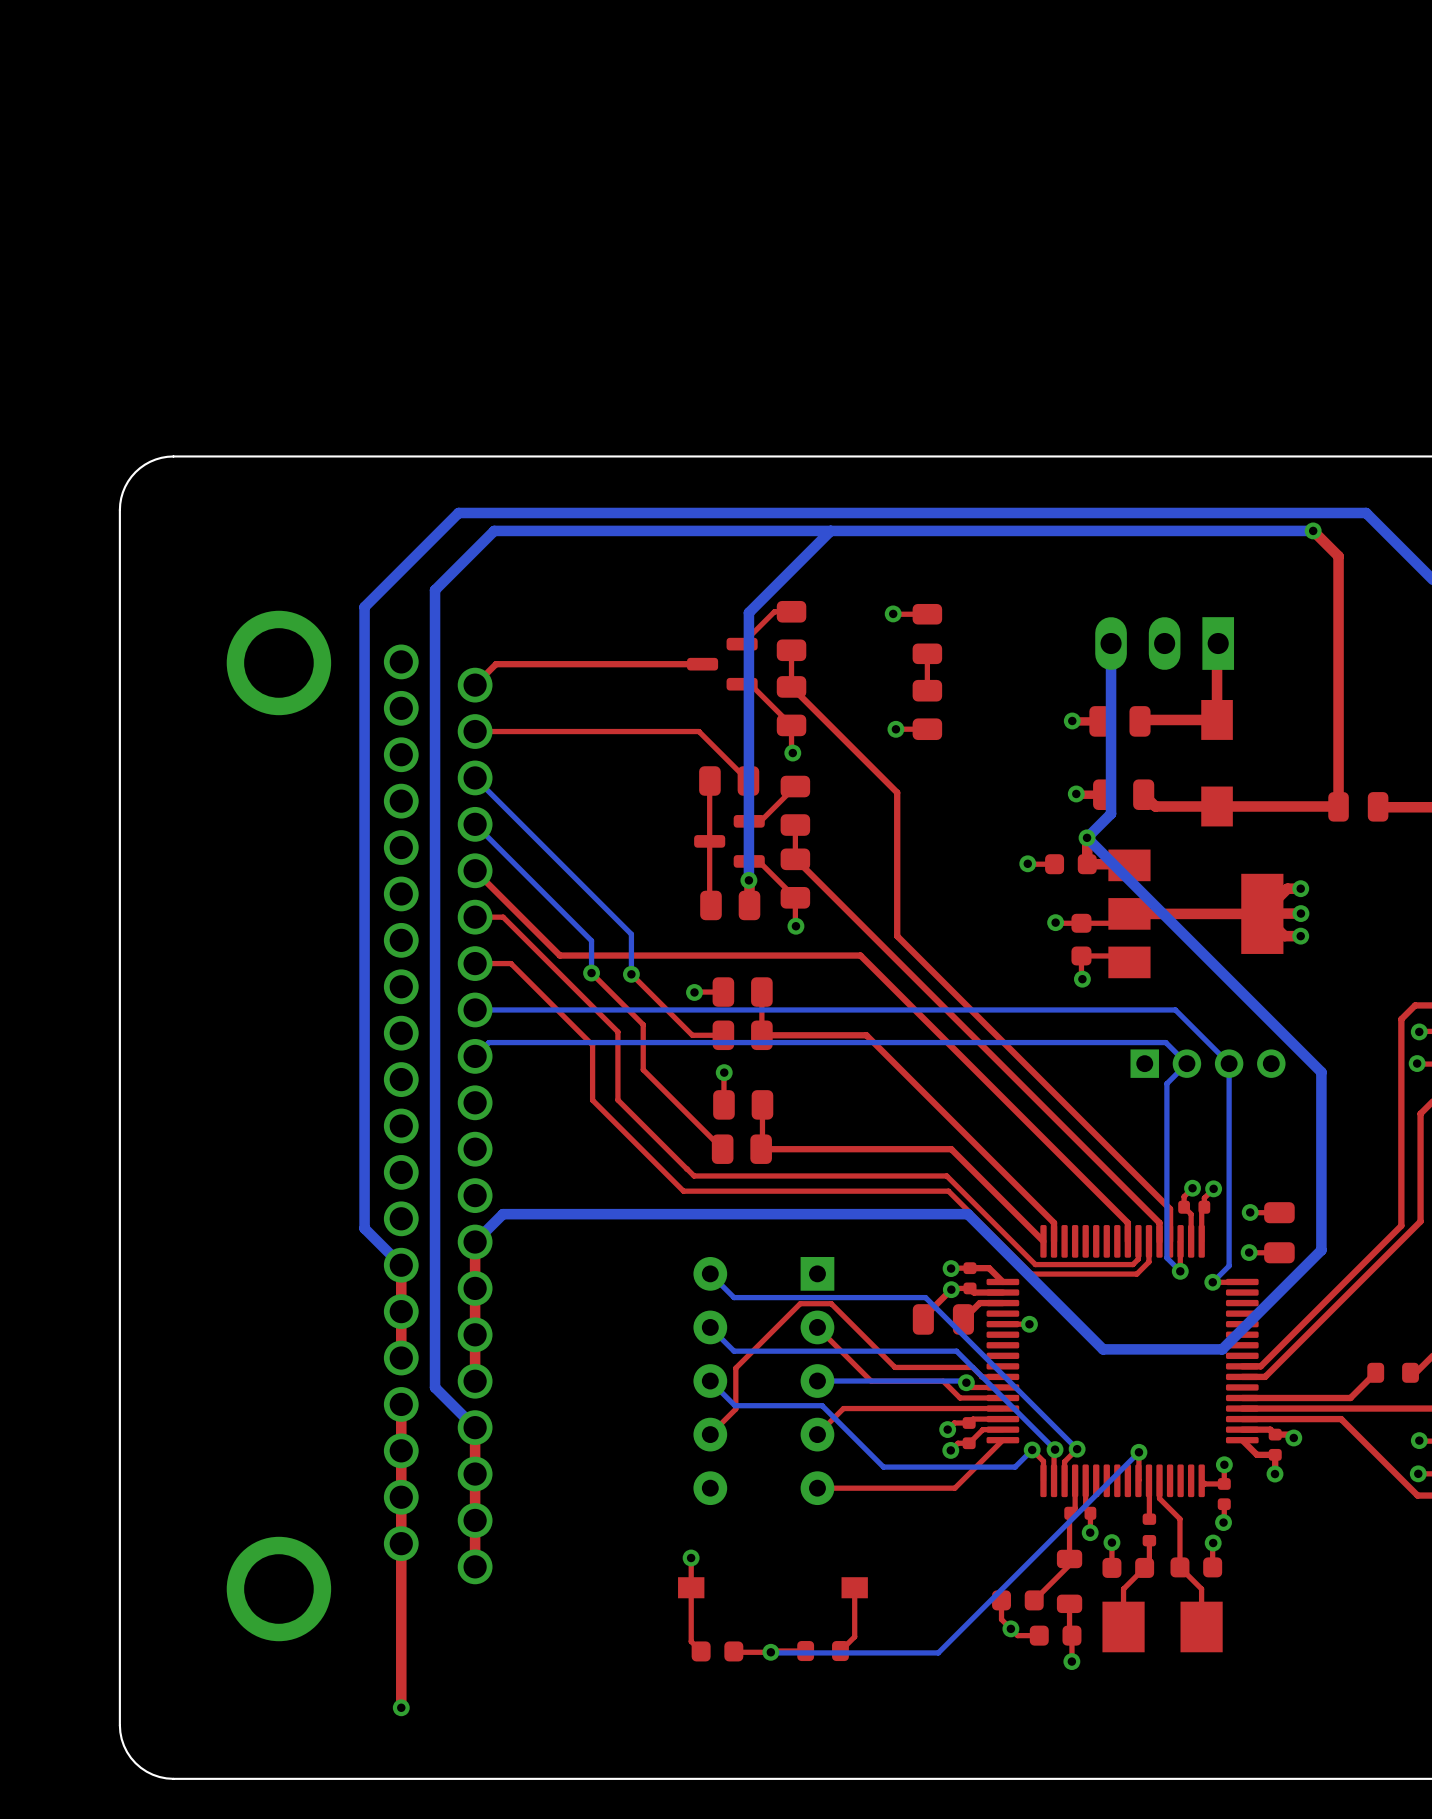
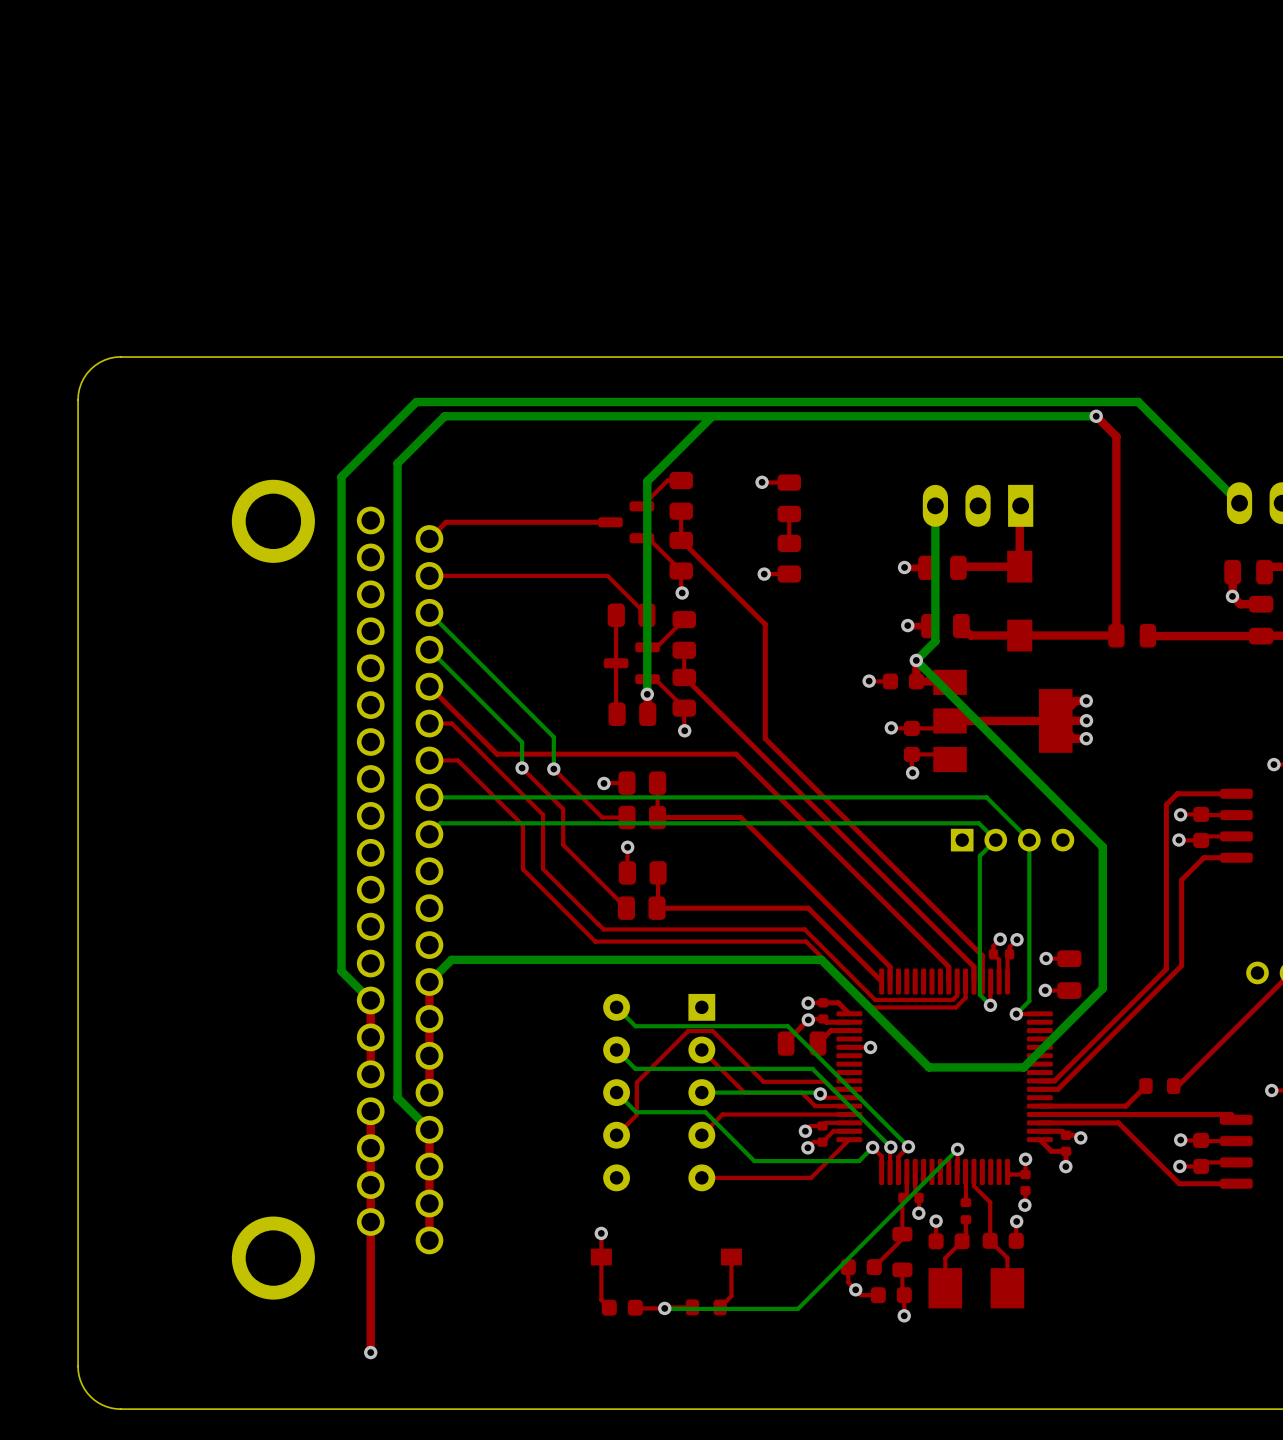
board edge: none -> (121, 356) (104, 360) (90, 369) (81, 383) (78, 399)
board edge: (173, 456) (150, 461) (135, 472) (122, 492) (119, 510) (119, 1725) (123, 1745) (135, 1763) (152, 1774) (173, 1778) -> (78, 399) (78, 1371) (80, 1380) (87, 1393) (97, 1402) (106, 1406) (120, 1409) (189, 1409)
board edge: none -> (189, 357) (121, 357)

